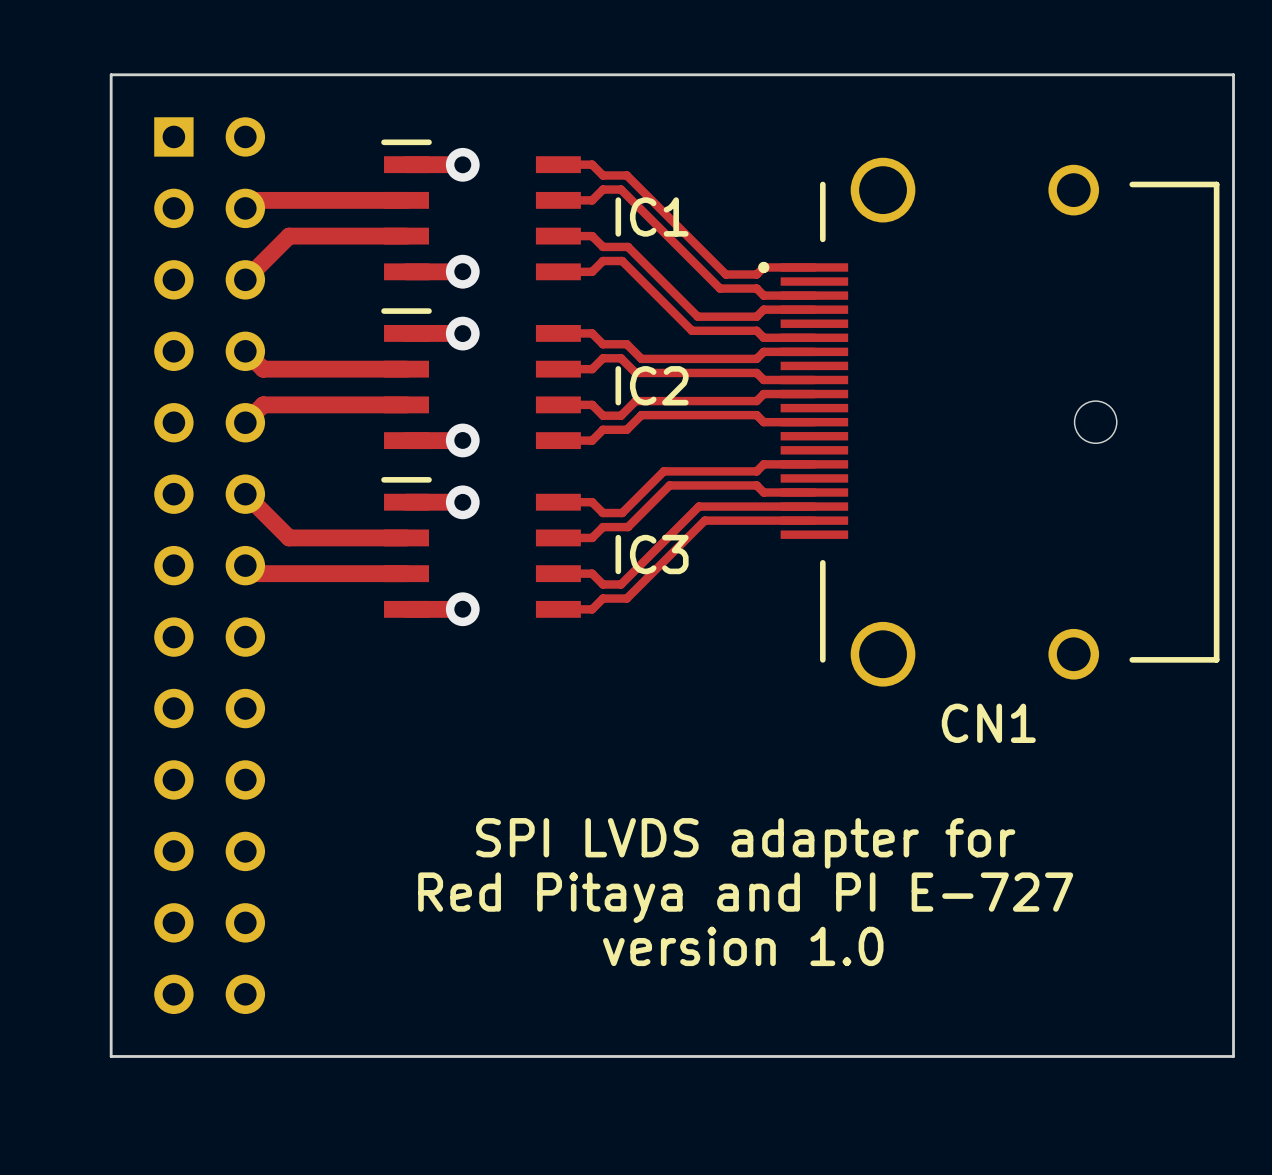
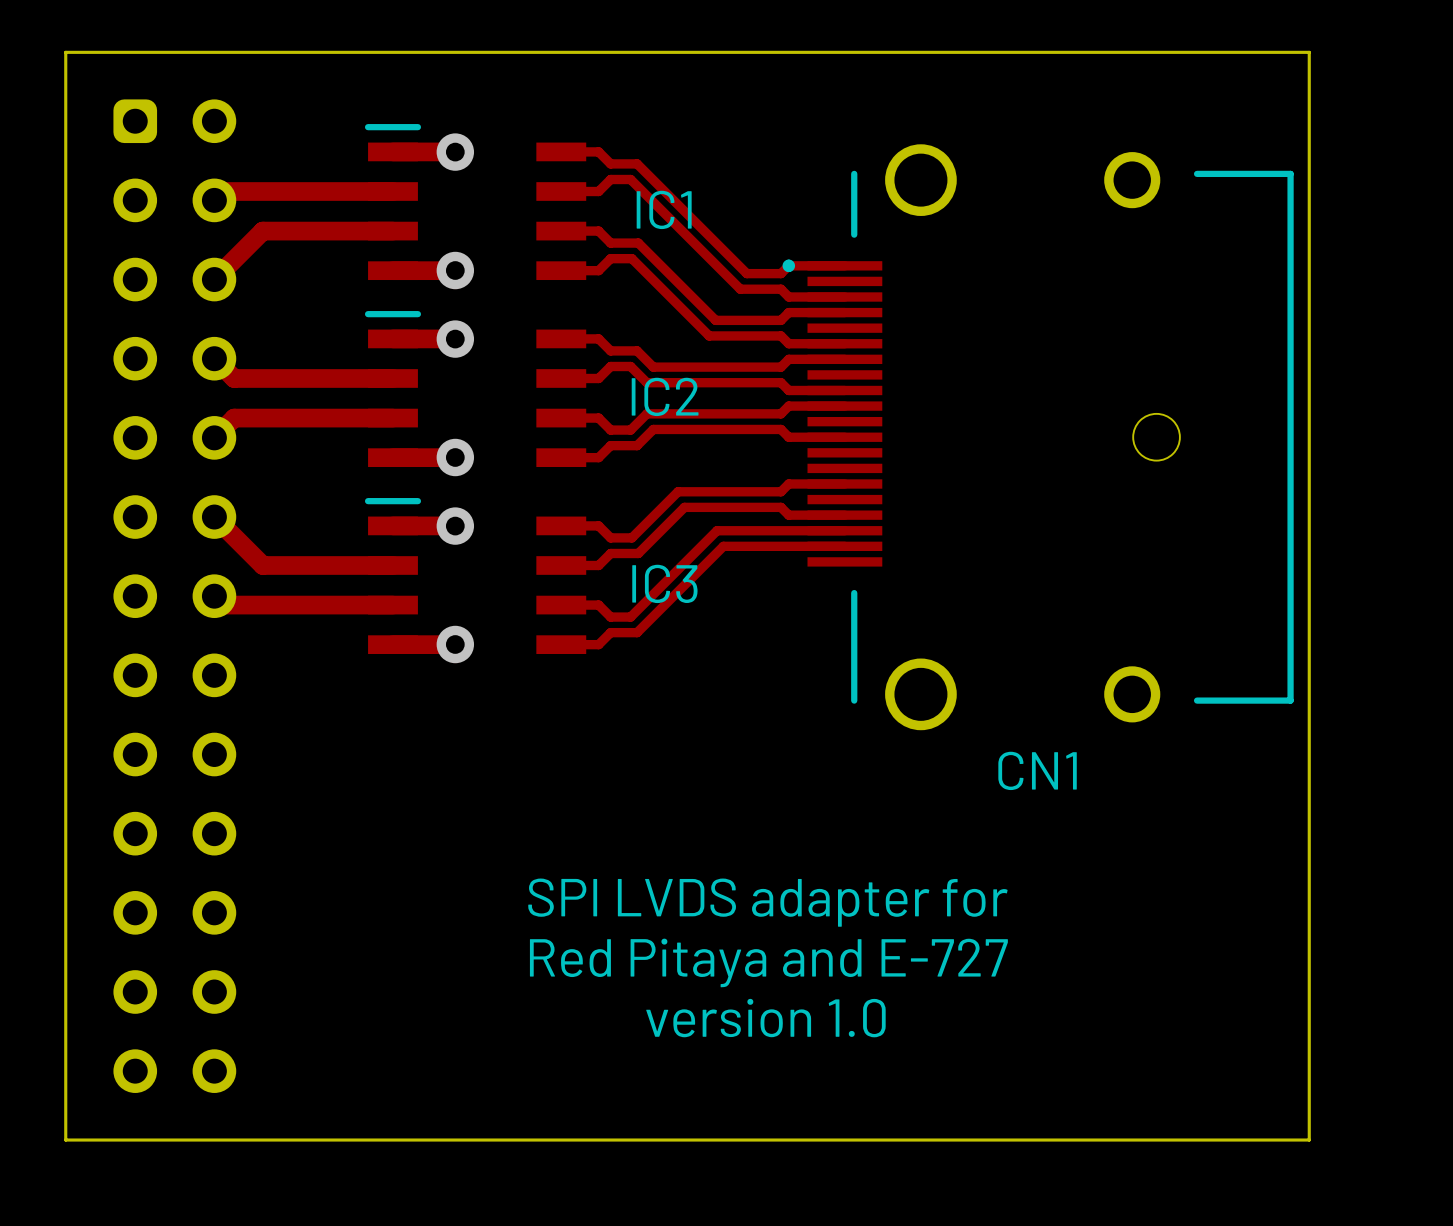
part footprint: [154, 117, 266, 1015] -> [113, 99, 237, 1093]
text: Red Pitaya and PI E-727 (745, 897) -> Red Pitaya and E-727 (768, 962)

